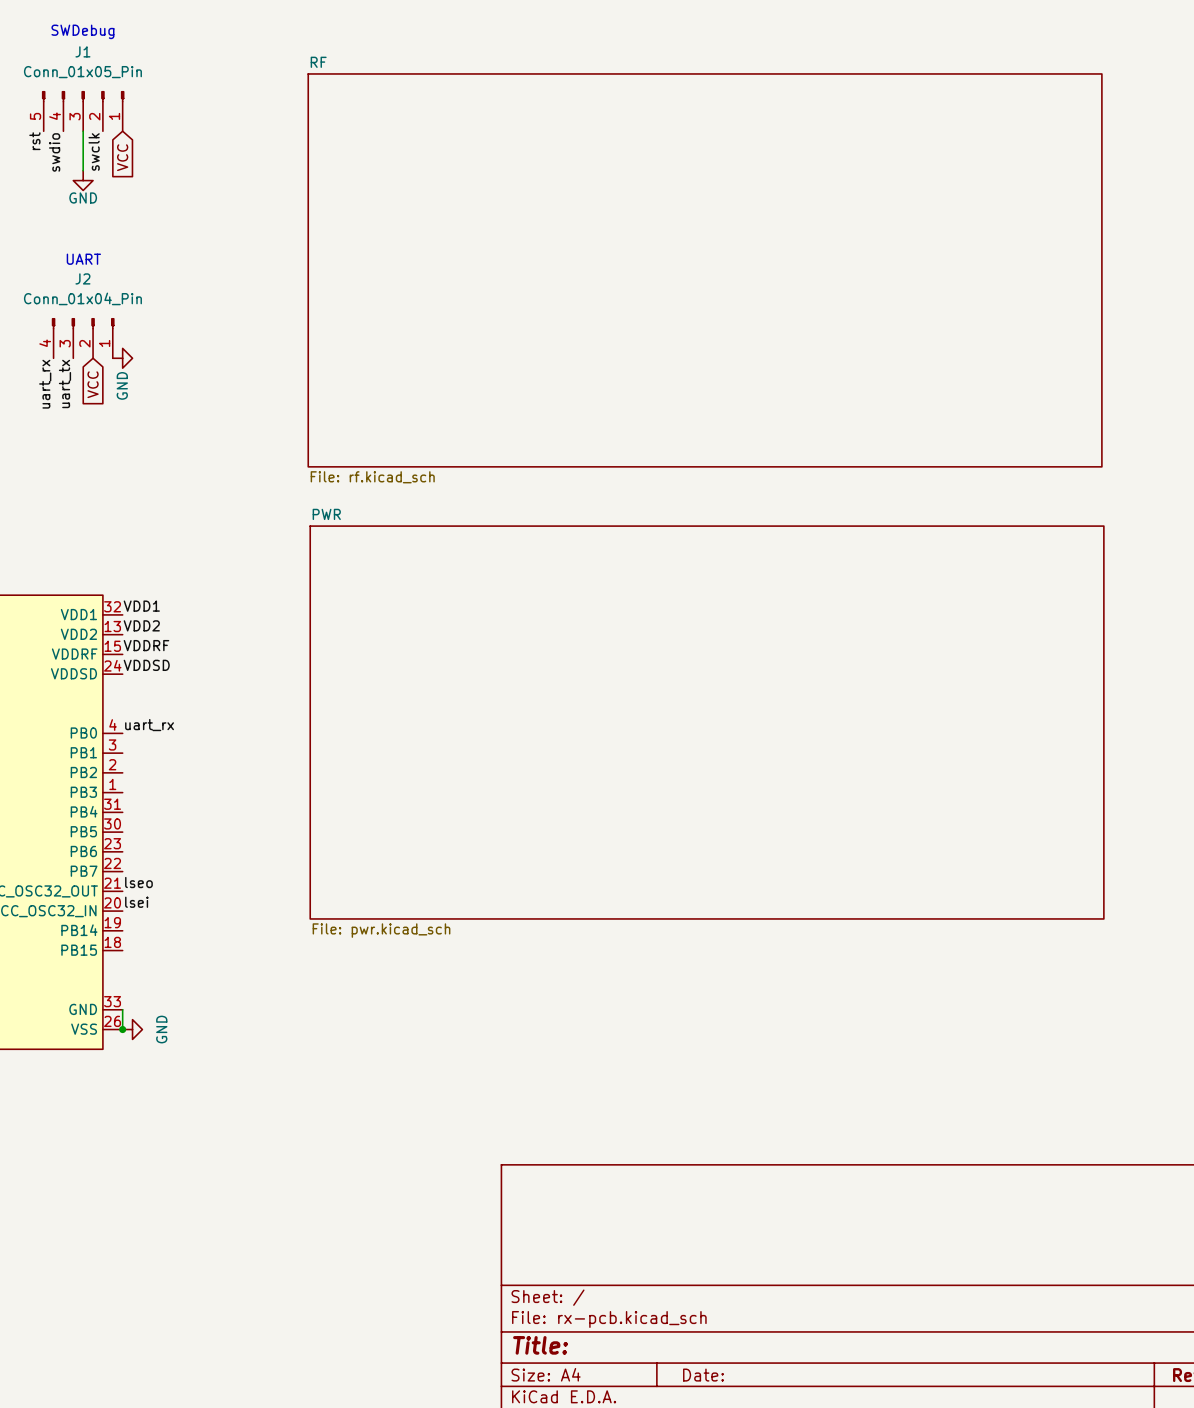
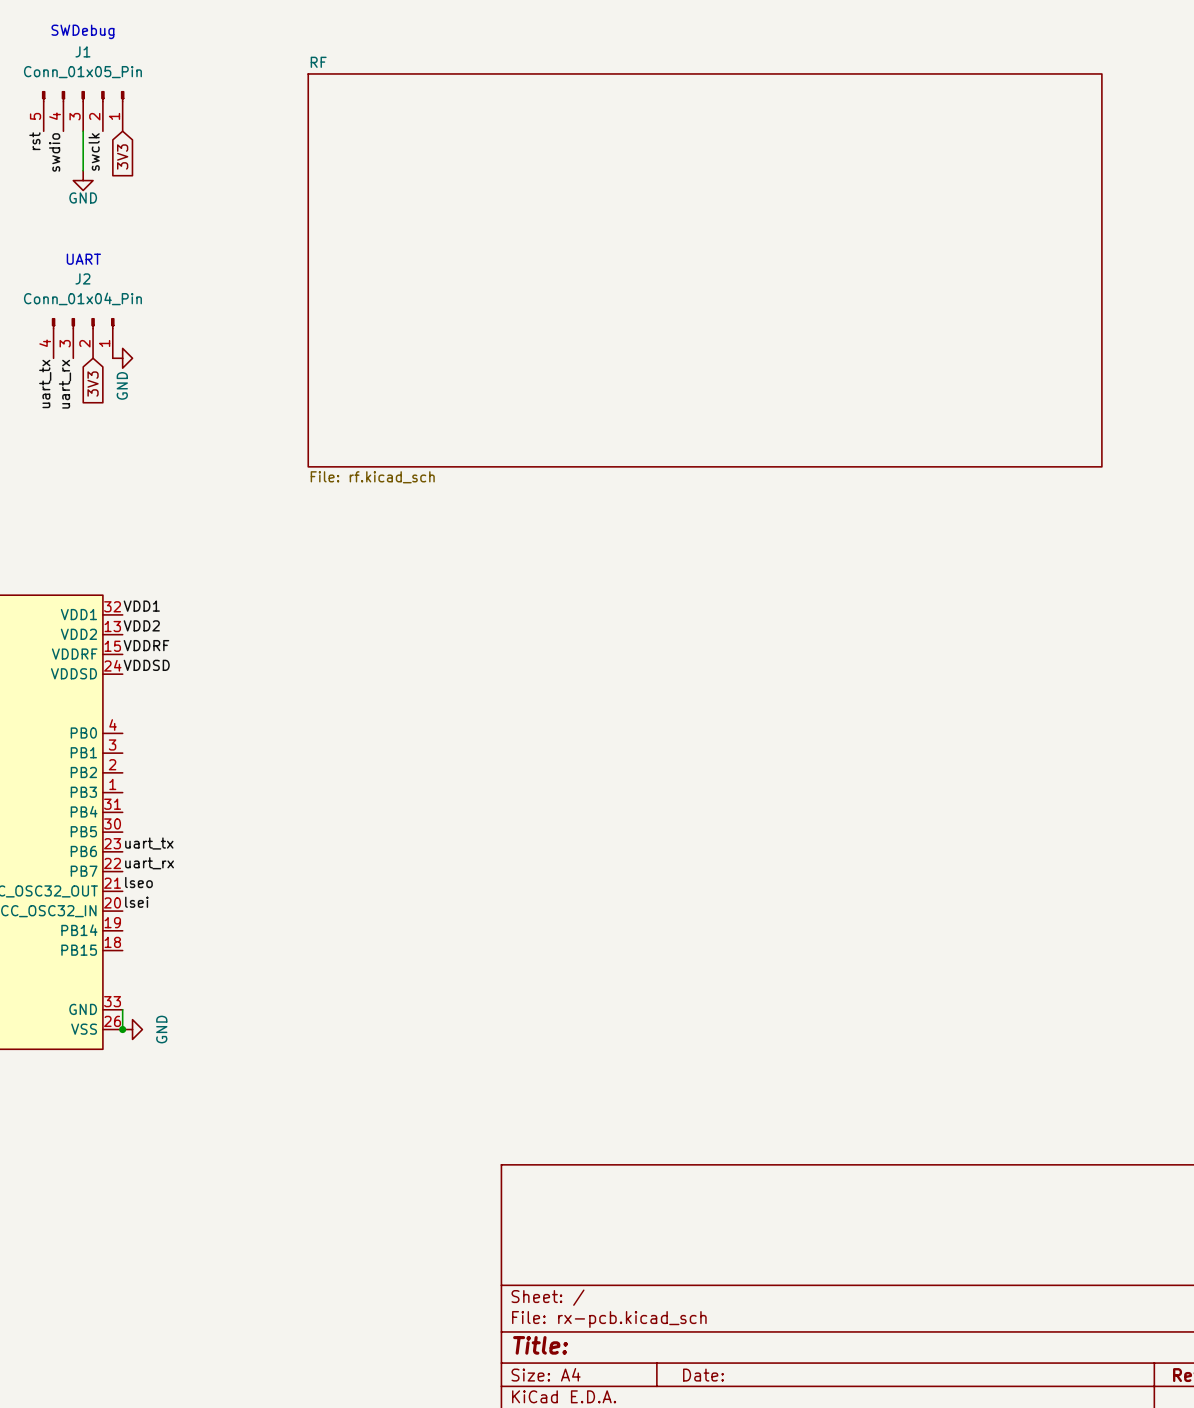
global label: VCC (122, 157) -> 3V3 (122, 156)
label: uart_tx (64, 383) -> uart_rx (64, 384)
label: uart_rx (45, 384) -> uart_tx (45, 383)
global label: VCC (93, 384) -> 3V3 (93, 384)
sheet PWR: File: pwr.kicad_sch (707, 722) -> none
label position: uart_rx (149, 725) -> uart_rx (149, 863)
label: none -> uart_tx (149, 843)

